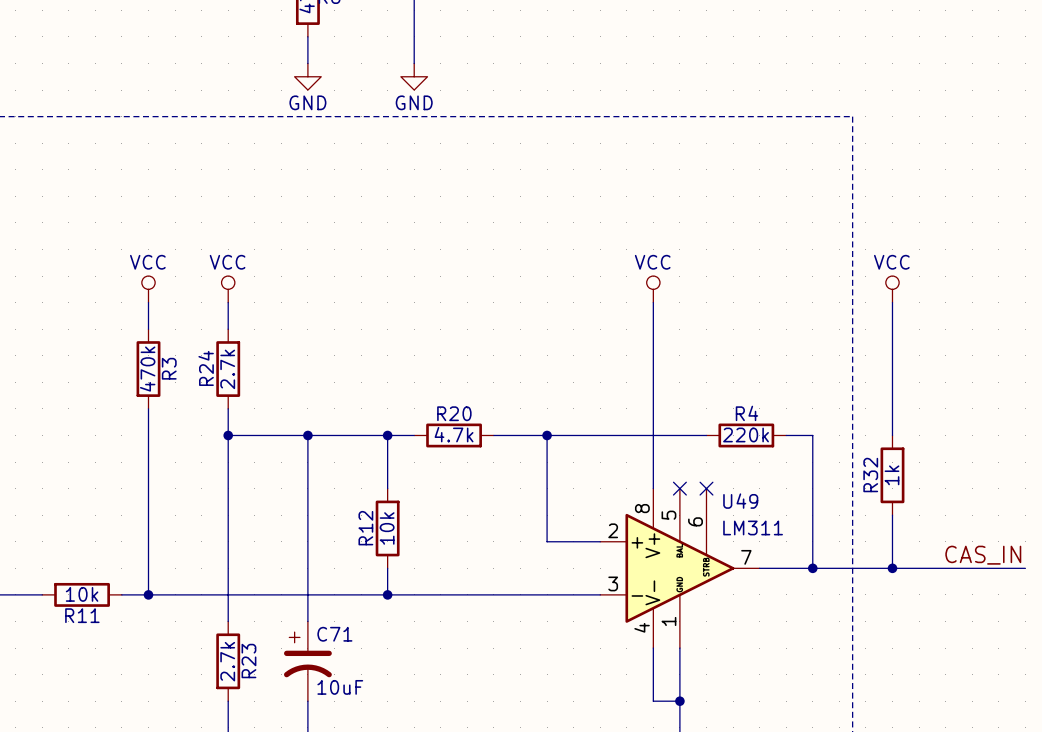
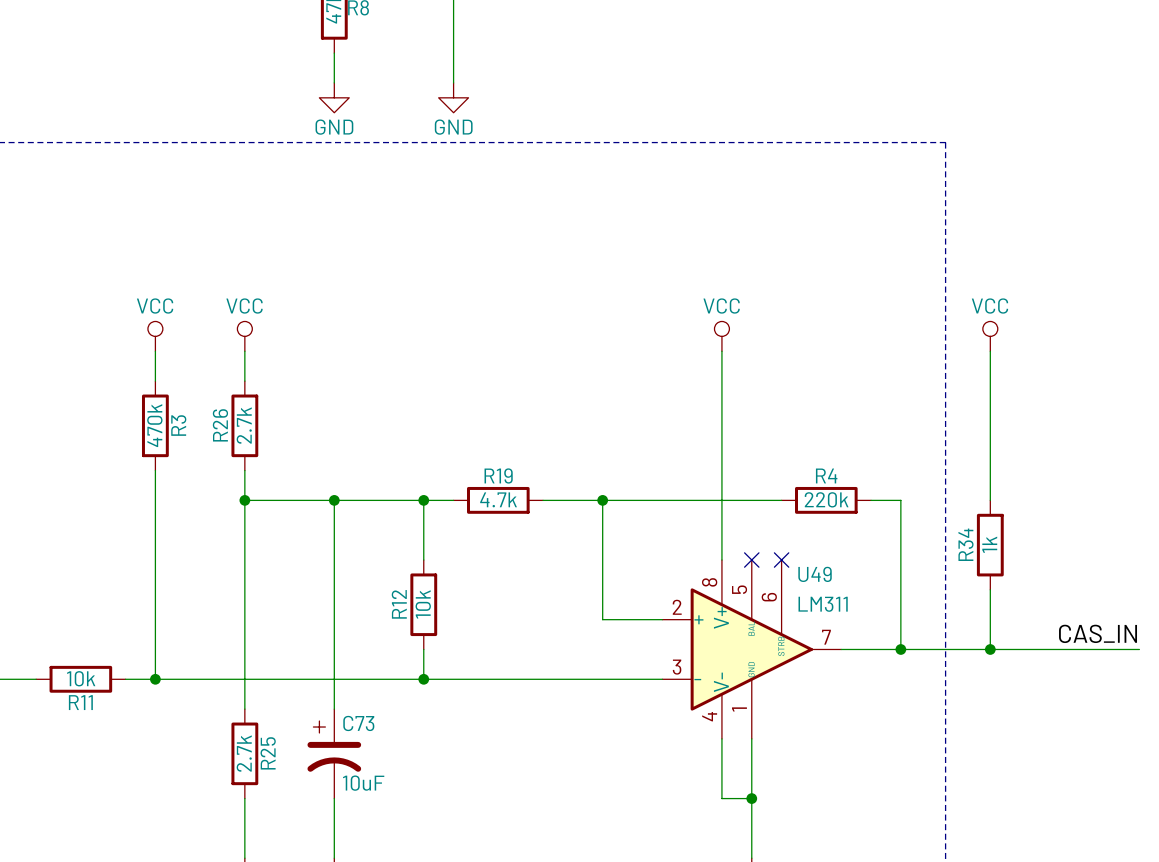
R24 name: R24 (206, 368) -> R26 (220, 425)
R20 name: R20 (454, 413) -> R19 (498, 475)
R32 name: R32 (870, 475) -> R34 (965, 544)
C71 name: C71 (334, 634) -> C73 (358, 723)
R23 name: R23 (248, 661) -> R25 (268, 753)

